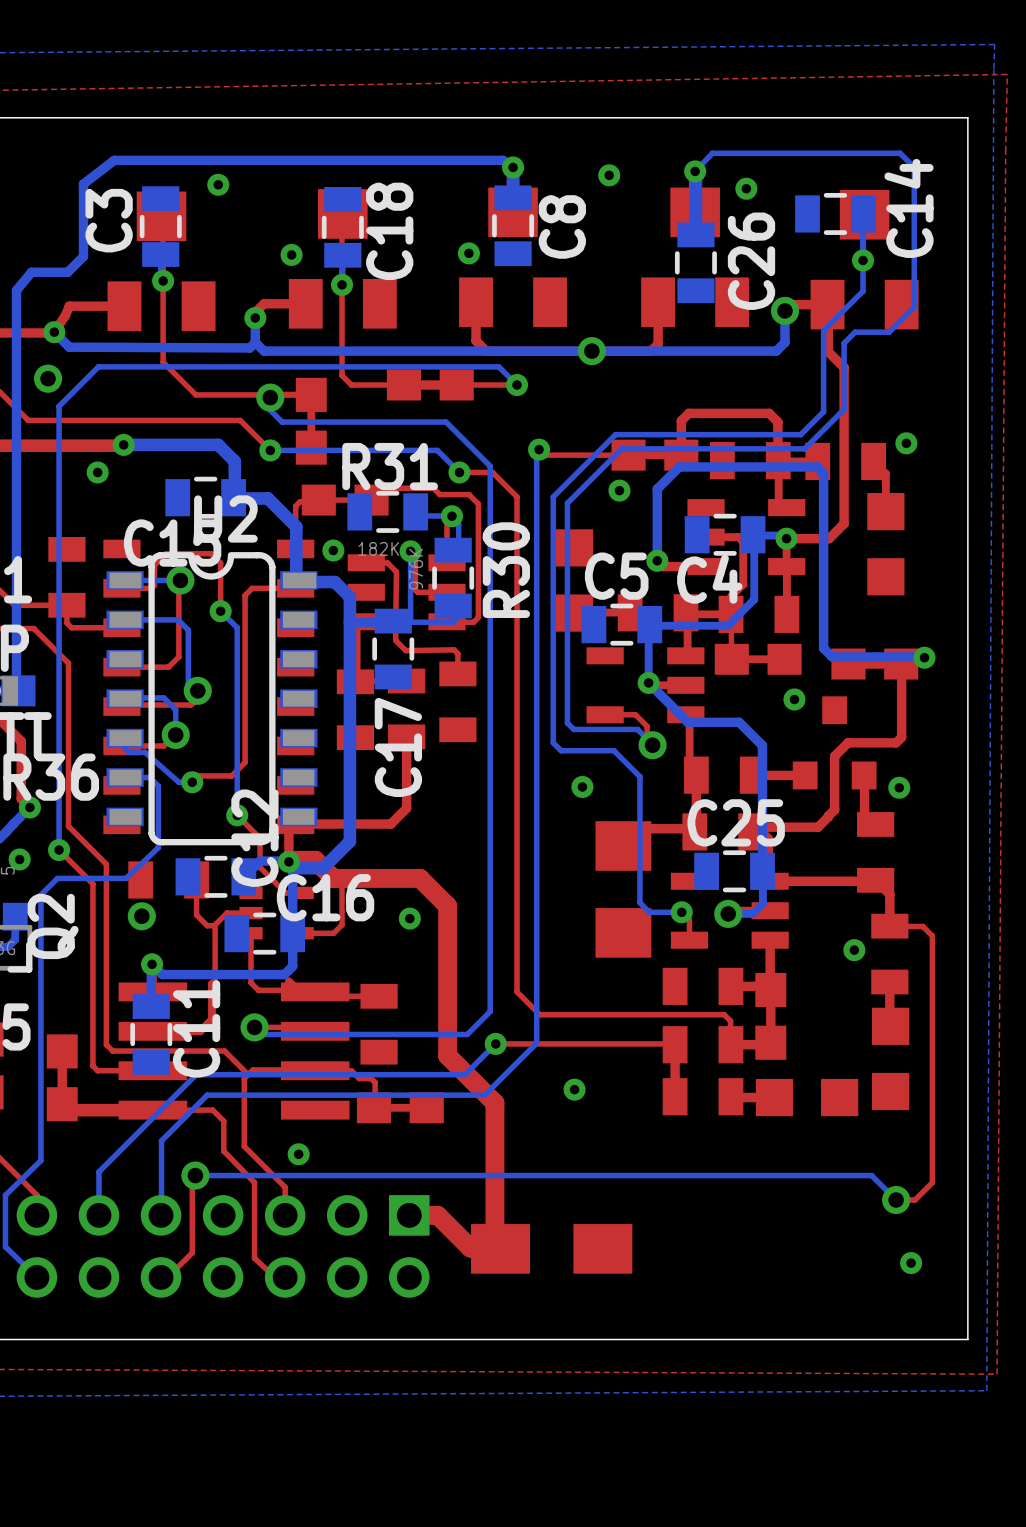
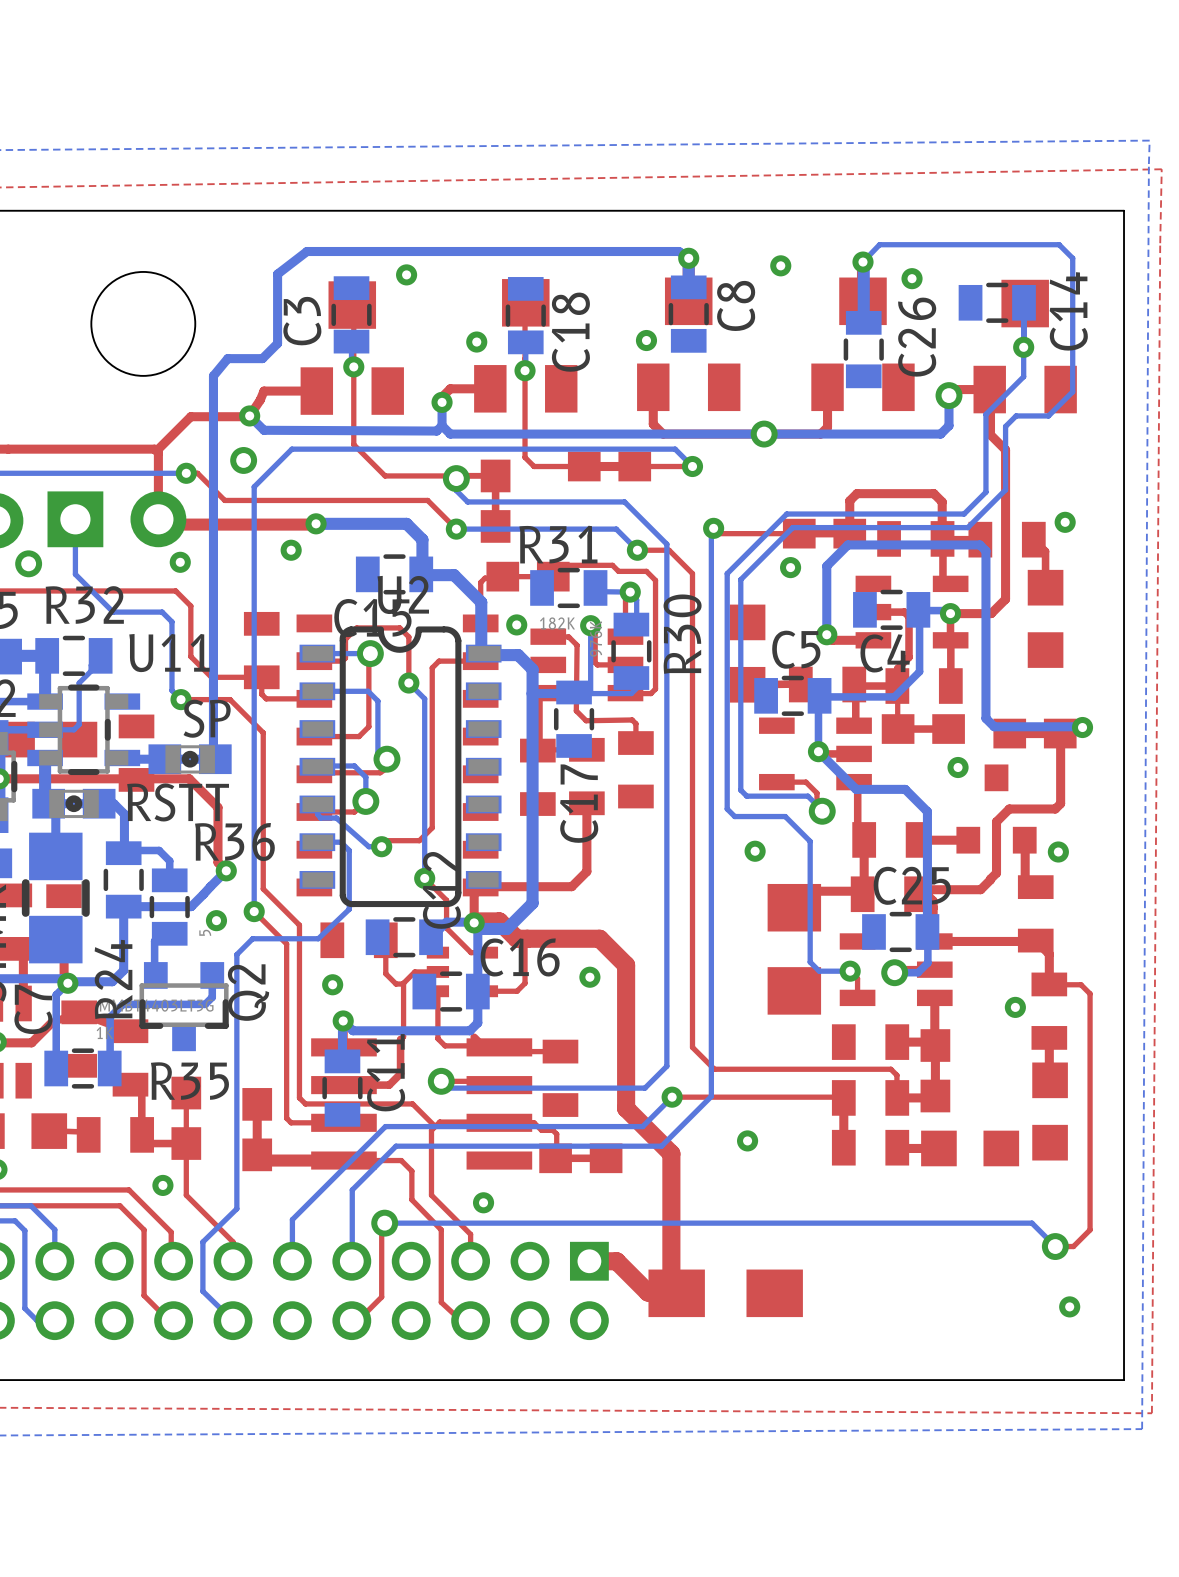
via size: [127, 902, 156, 931] -> [322, 974, 344, 996]

